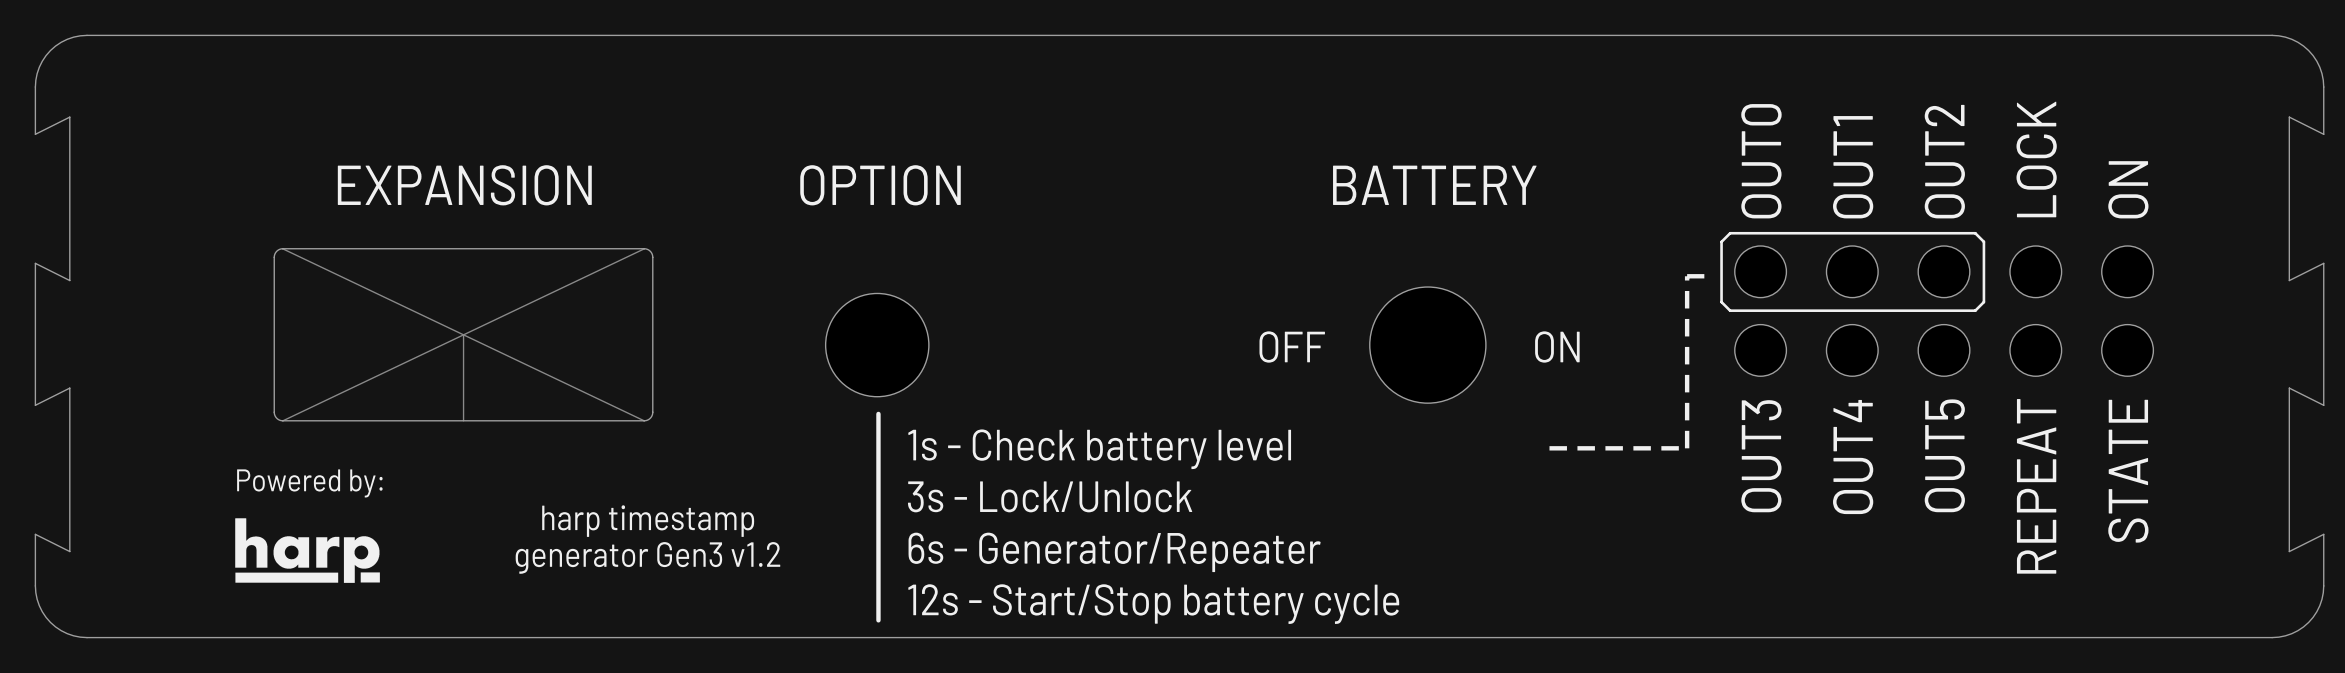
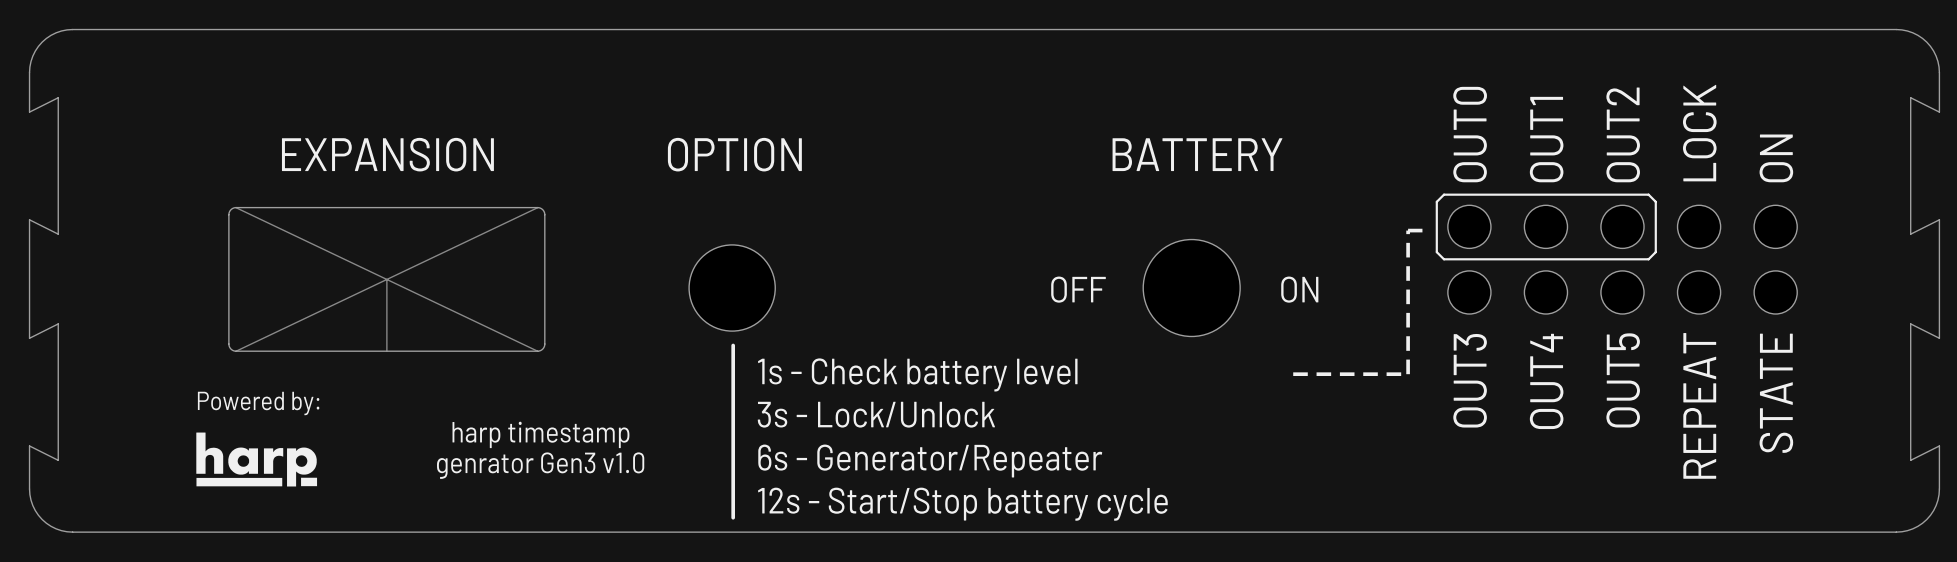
text: generator Gen3 v1.2 (647, 557) -> genrator Gen3 v1.0 (540, 465)

